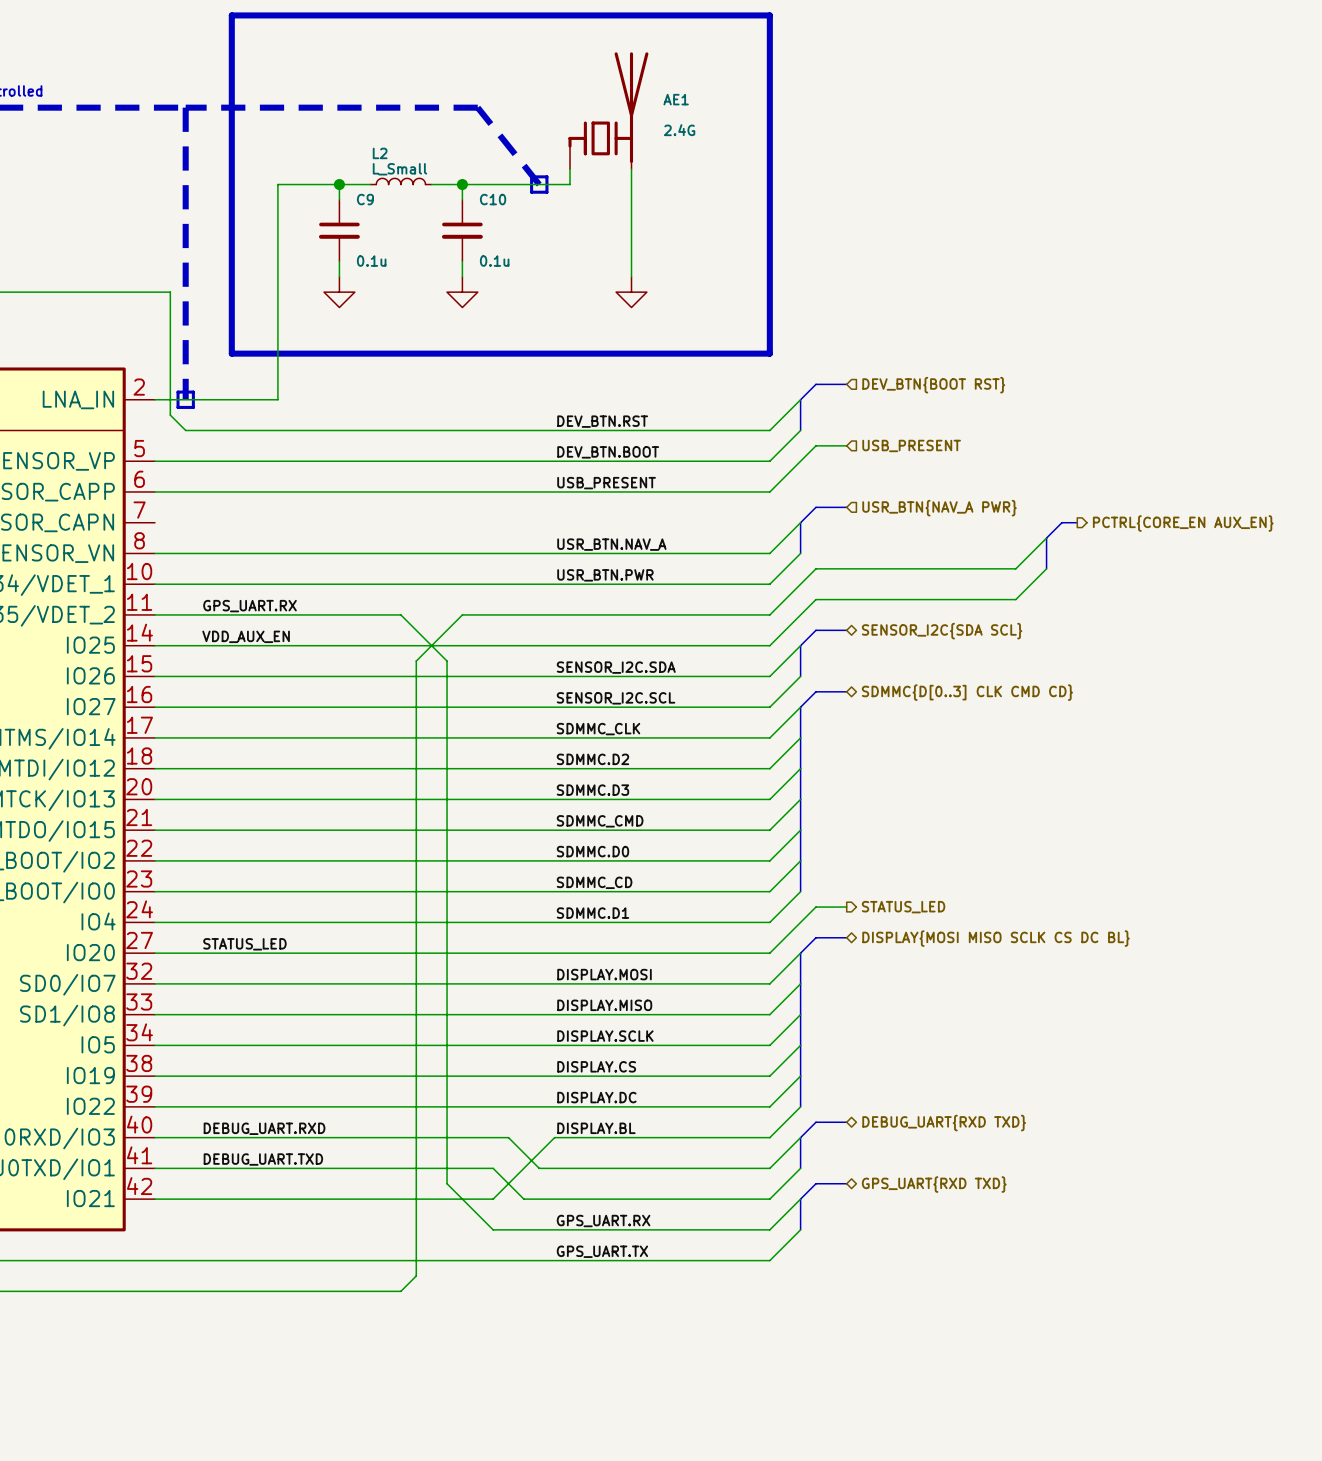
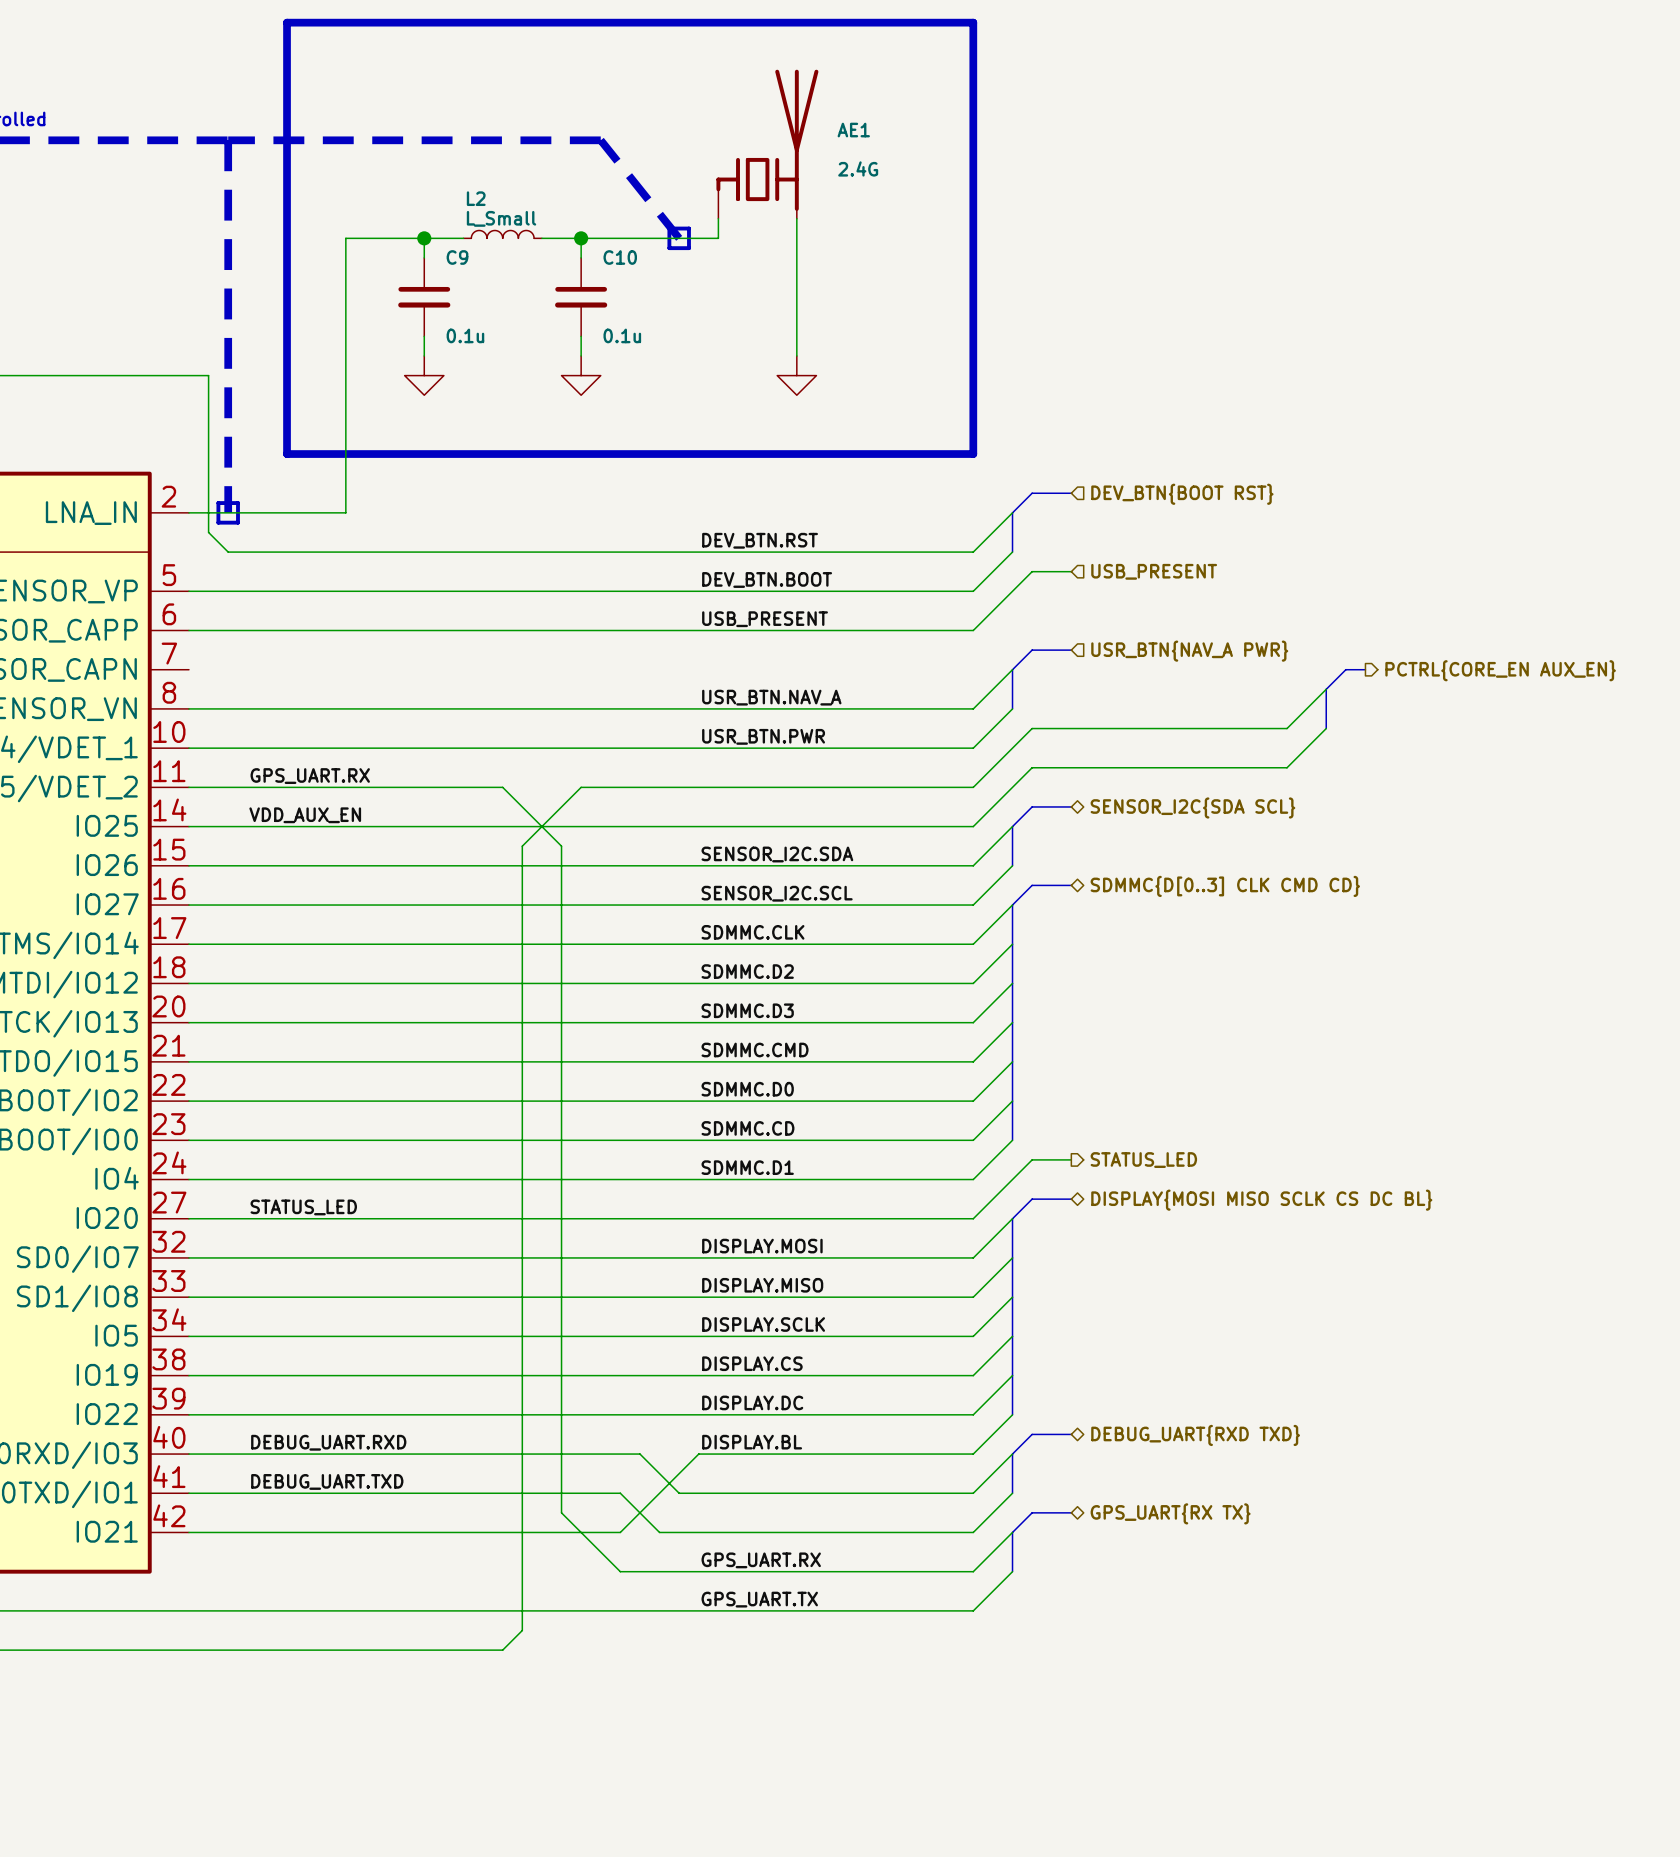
label: SDMMC_CLK (598, 729) -> SDMMC.CLK (752, 932)
label: SDMMC_CMD (600, 821) -> SDMMC.CMD (755, 1049)
label: SDMMC_CD (594, 882) -> SDMMC.CD (747, 1128)
hierarchical label: GPS_UART{RXD TXD} (934, 1184) -> GPS_UART{RX TX} (1170, 1513)

